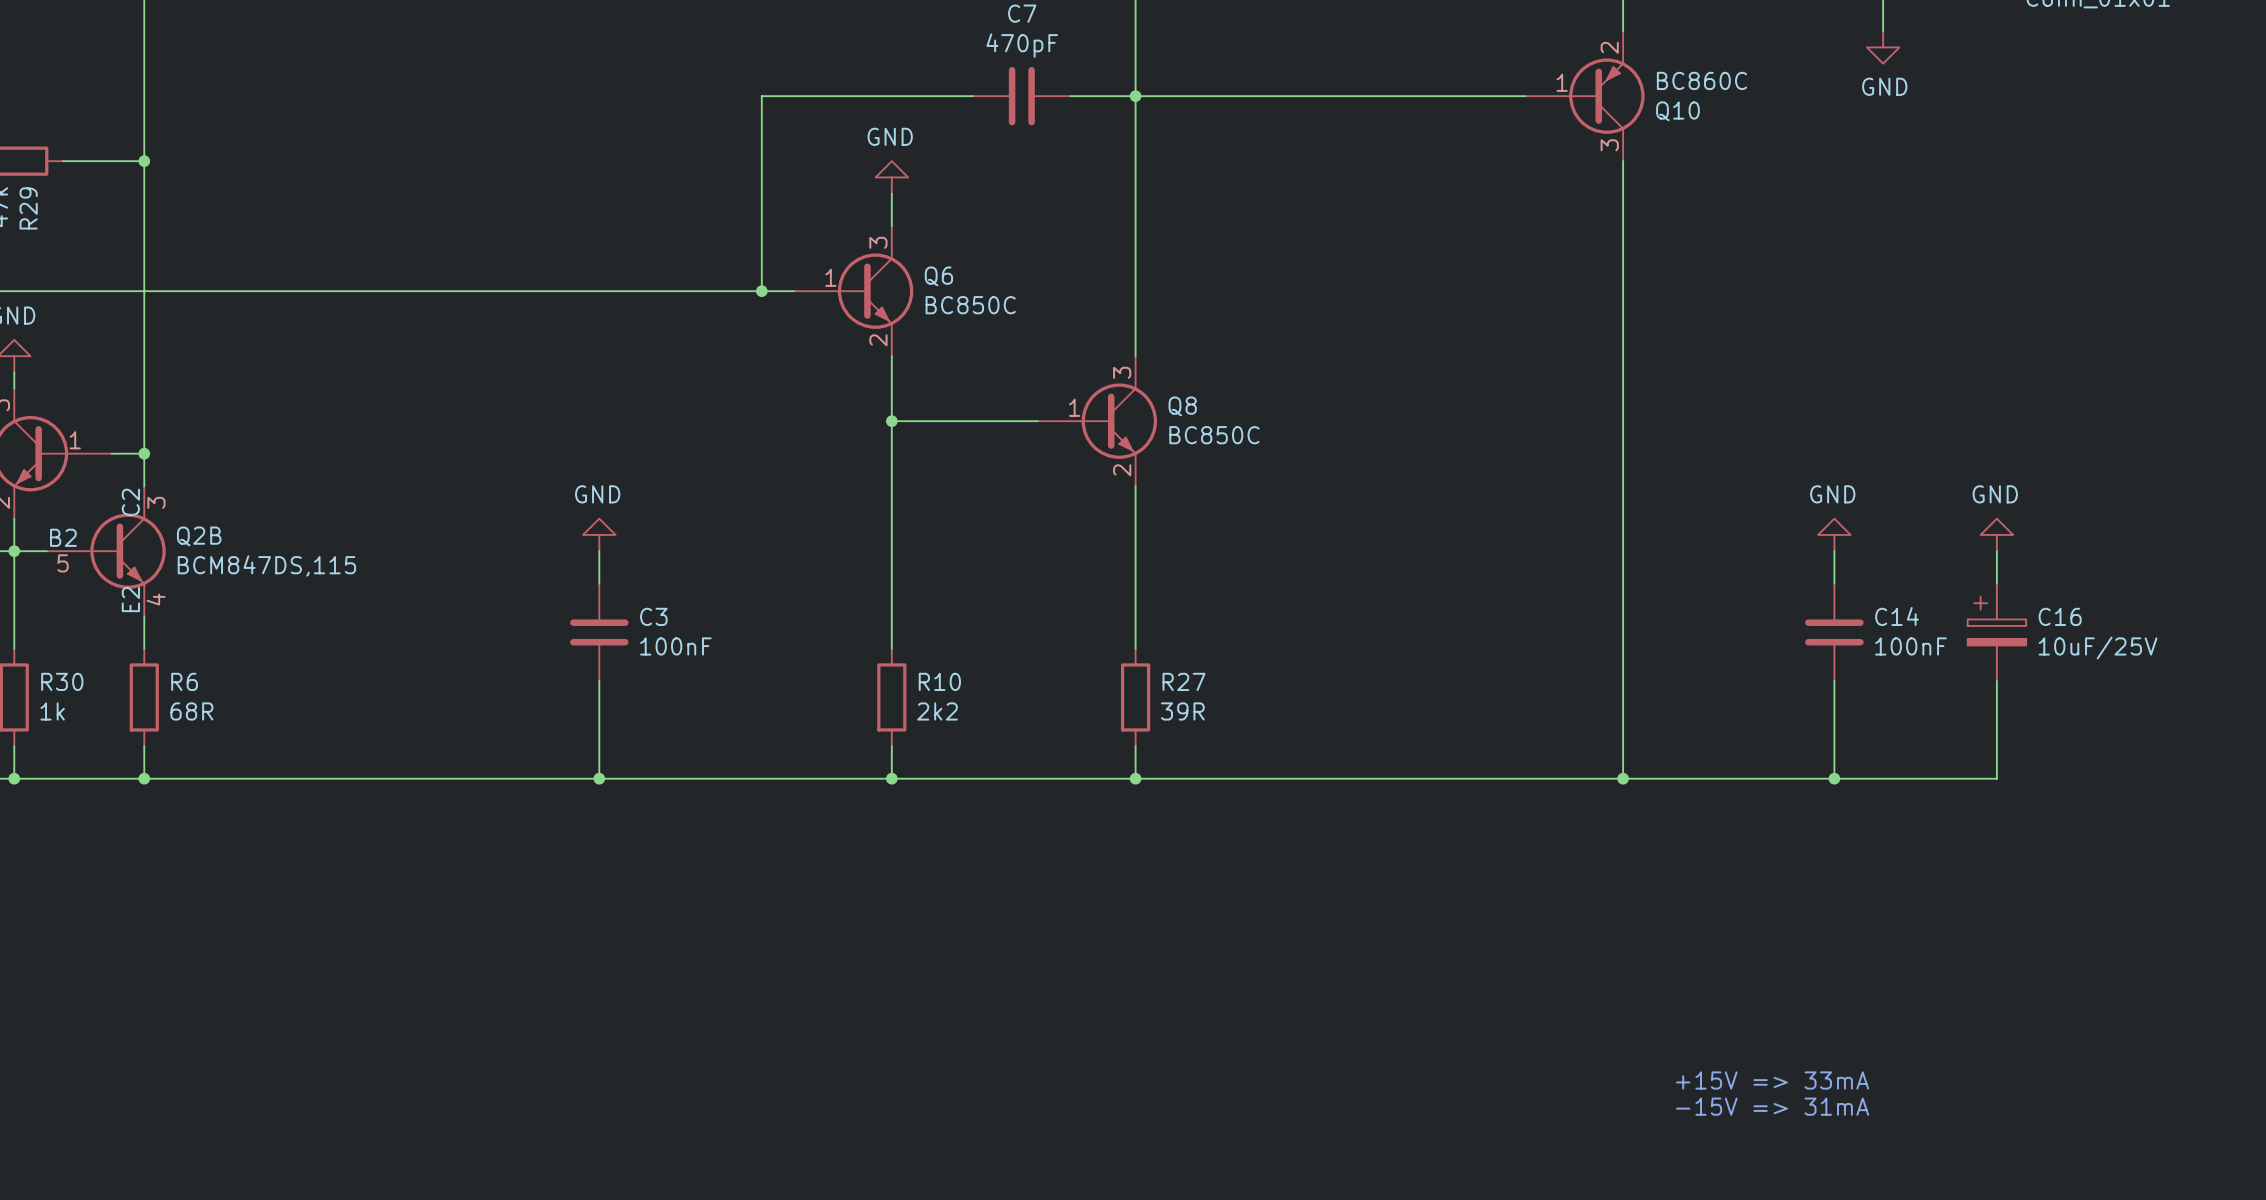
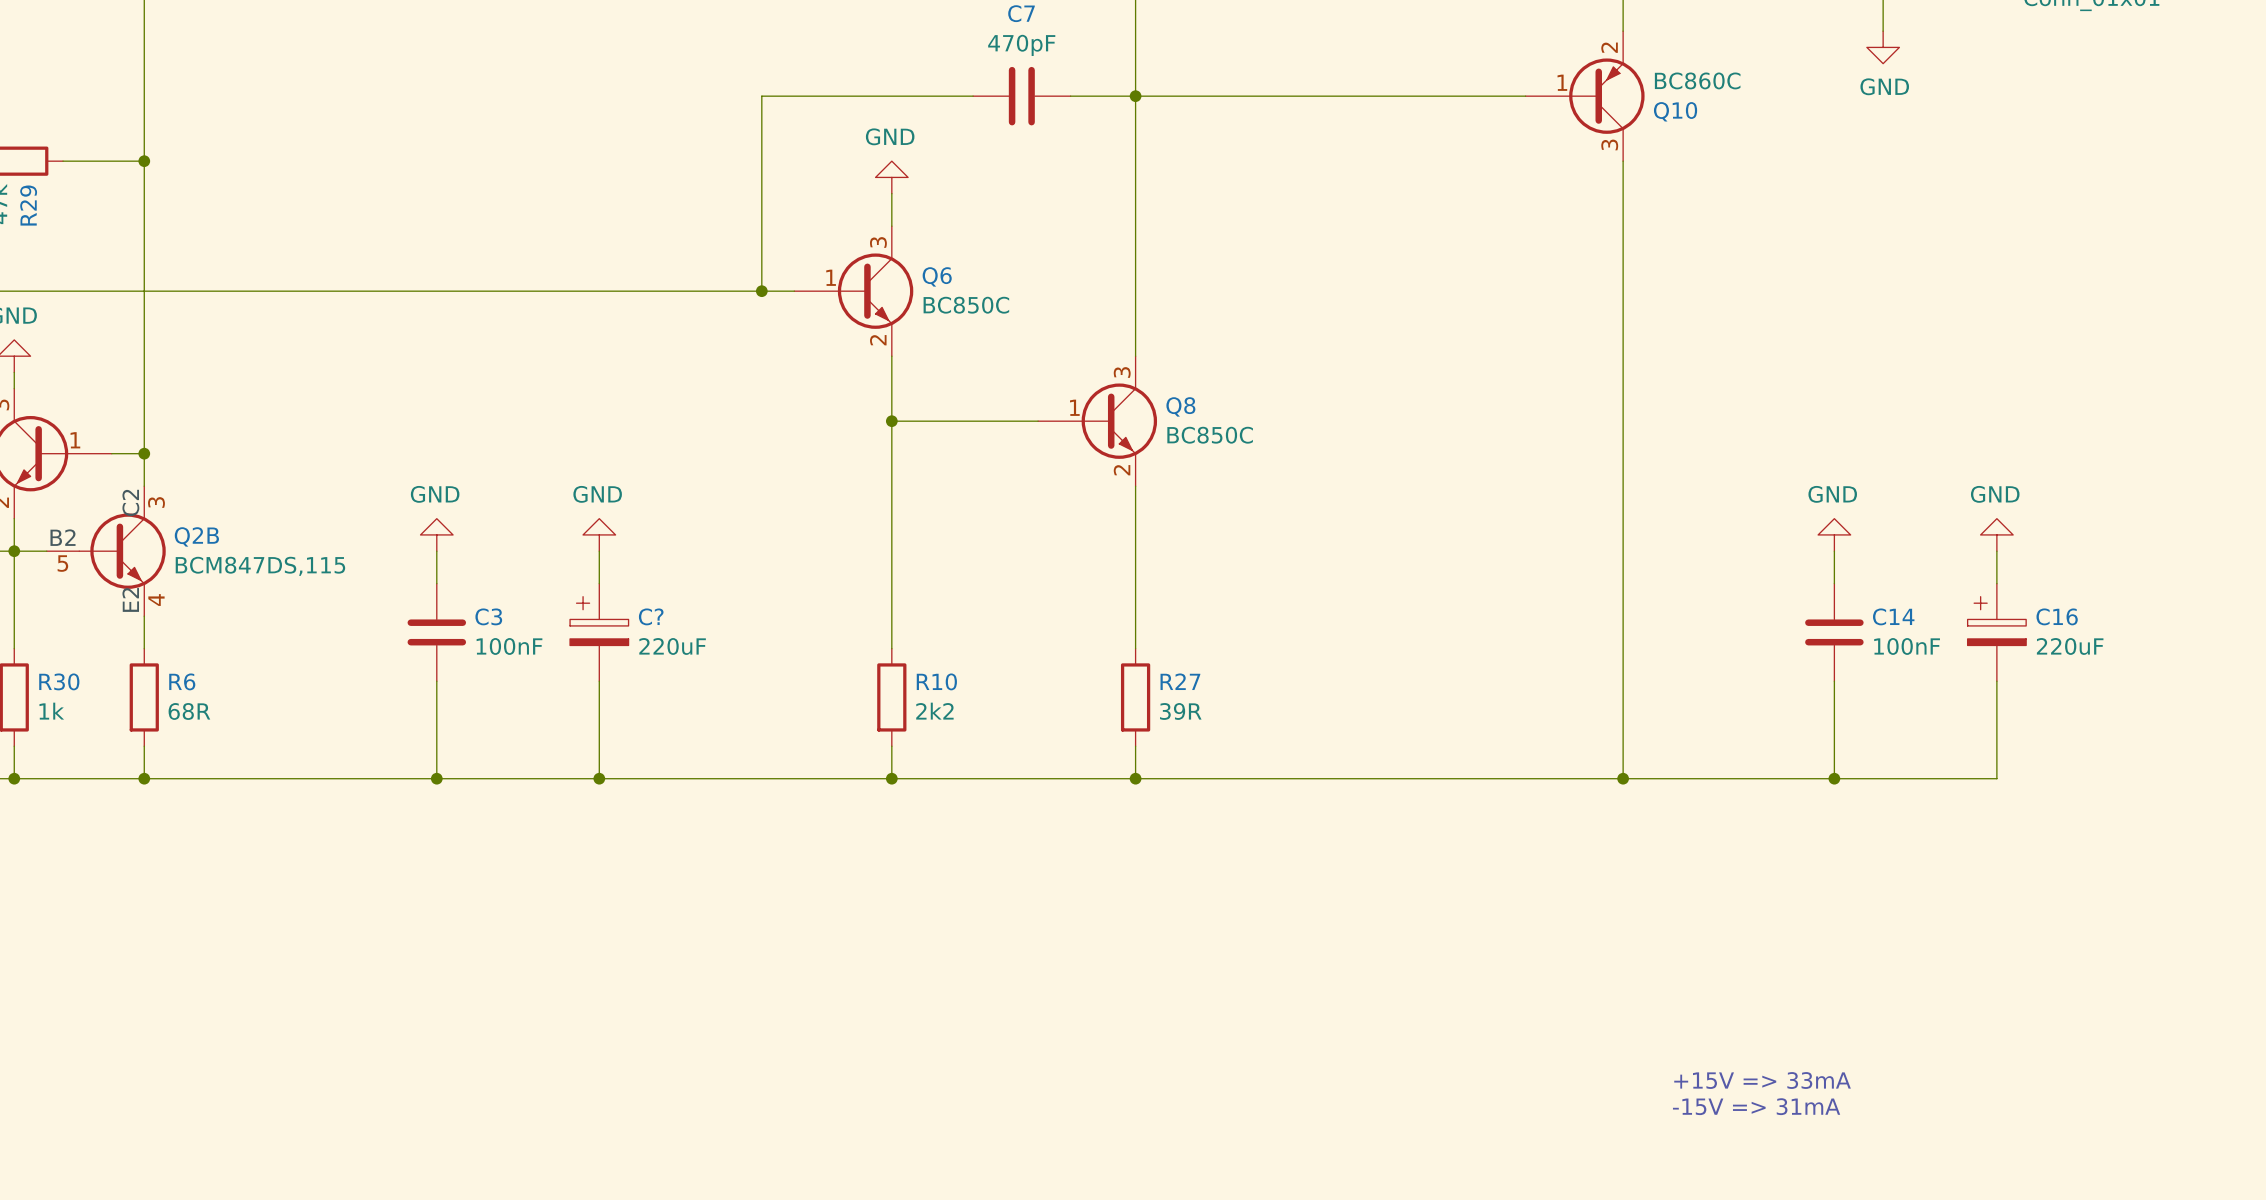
power symbol: none -> GND (436, 534)
wire: none -> (436, 551) (436, 583)
C3 position: (599, 632) -> (436, 632)
C?: none -> 220uF (599, 632)
C16 value: 10uF/25V (2098, 648) -> 220uF (2070, 646)
wire: none -> (436, 681) (436, 778)
junction: none -> (436, 778)

